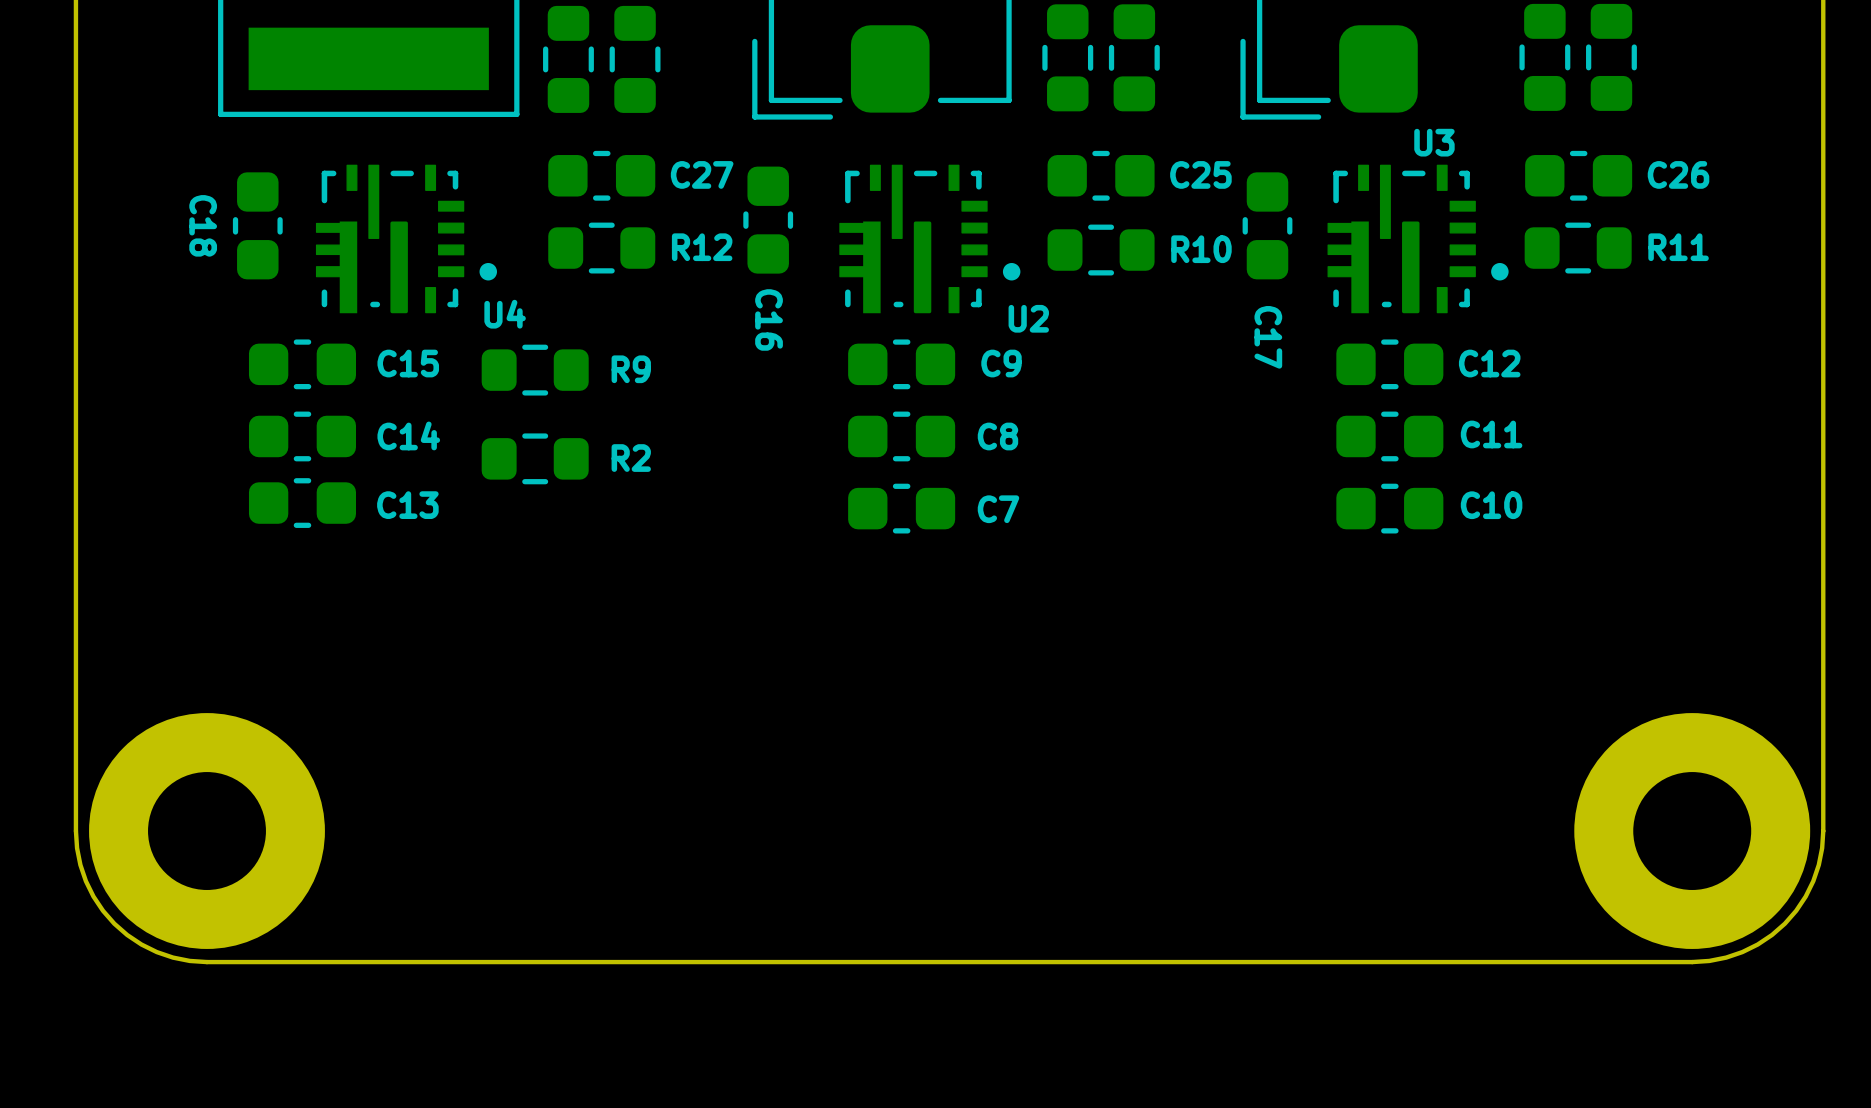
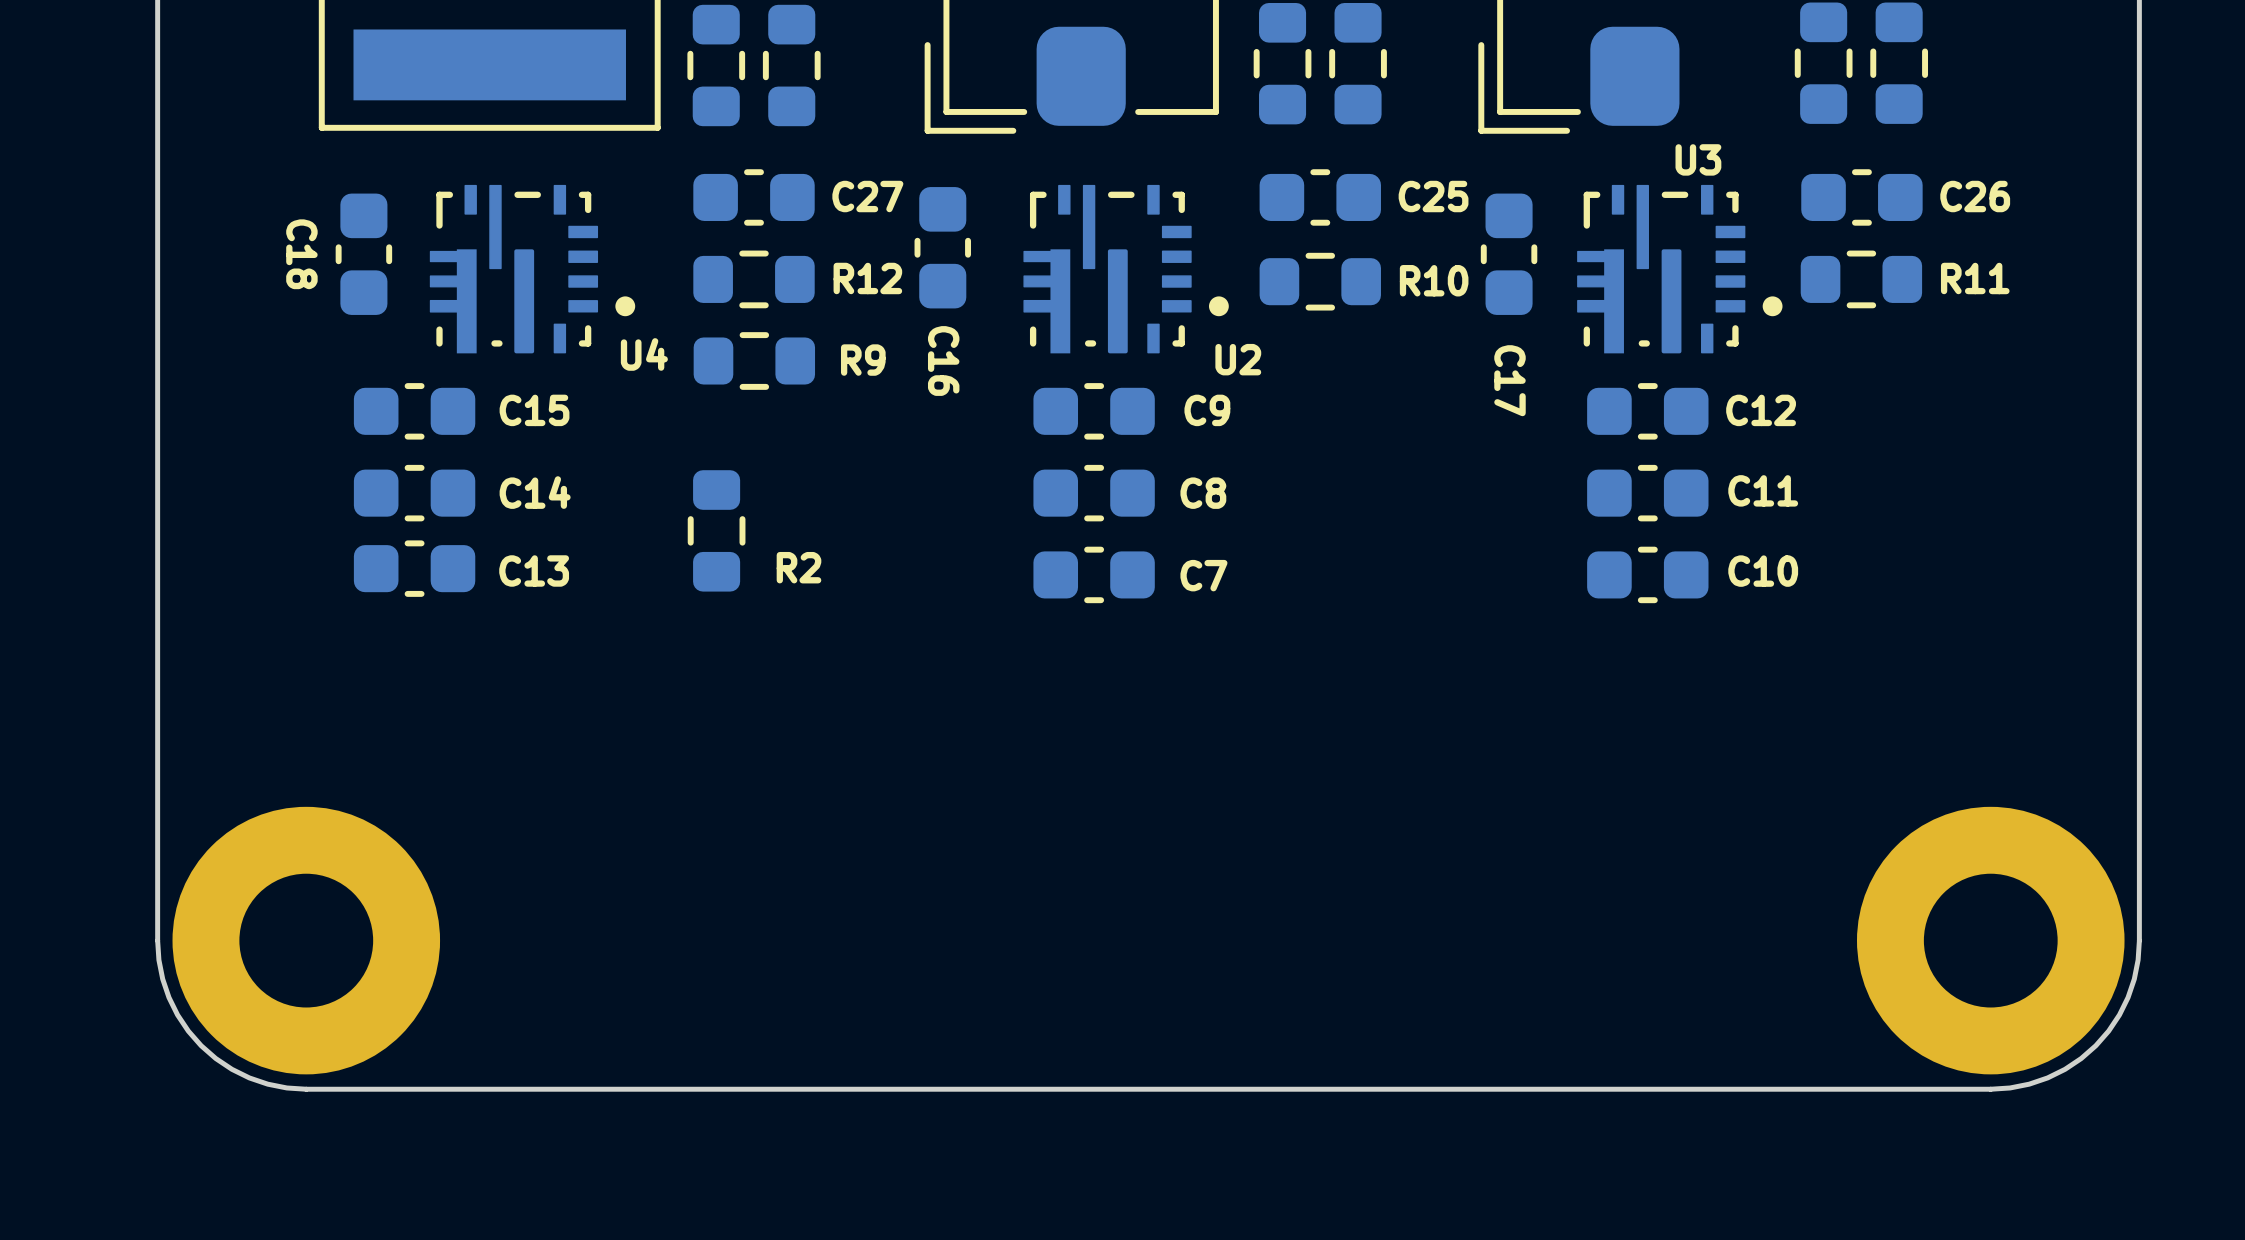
R9 position: (535, 370) -> (754, 361)
R2 rotation: 0° (535, 458) -> 90° clockwise (716, 530)

